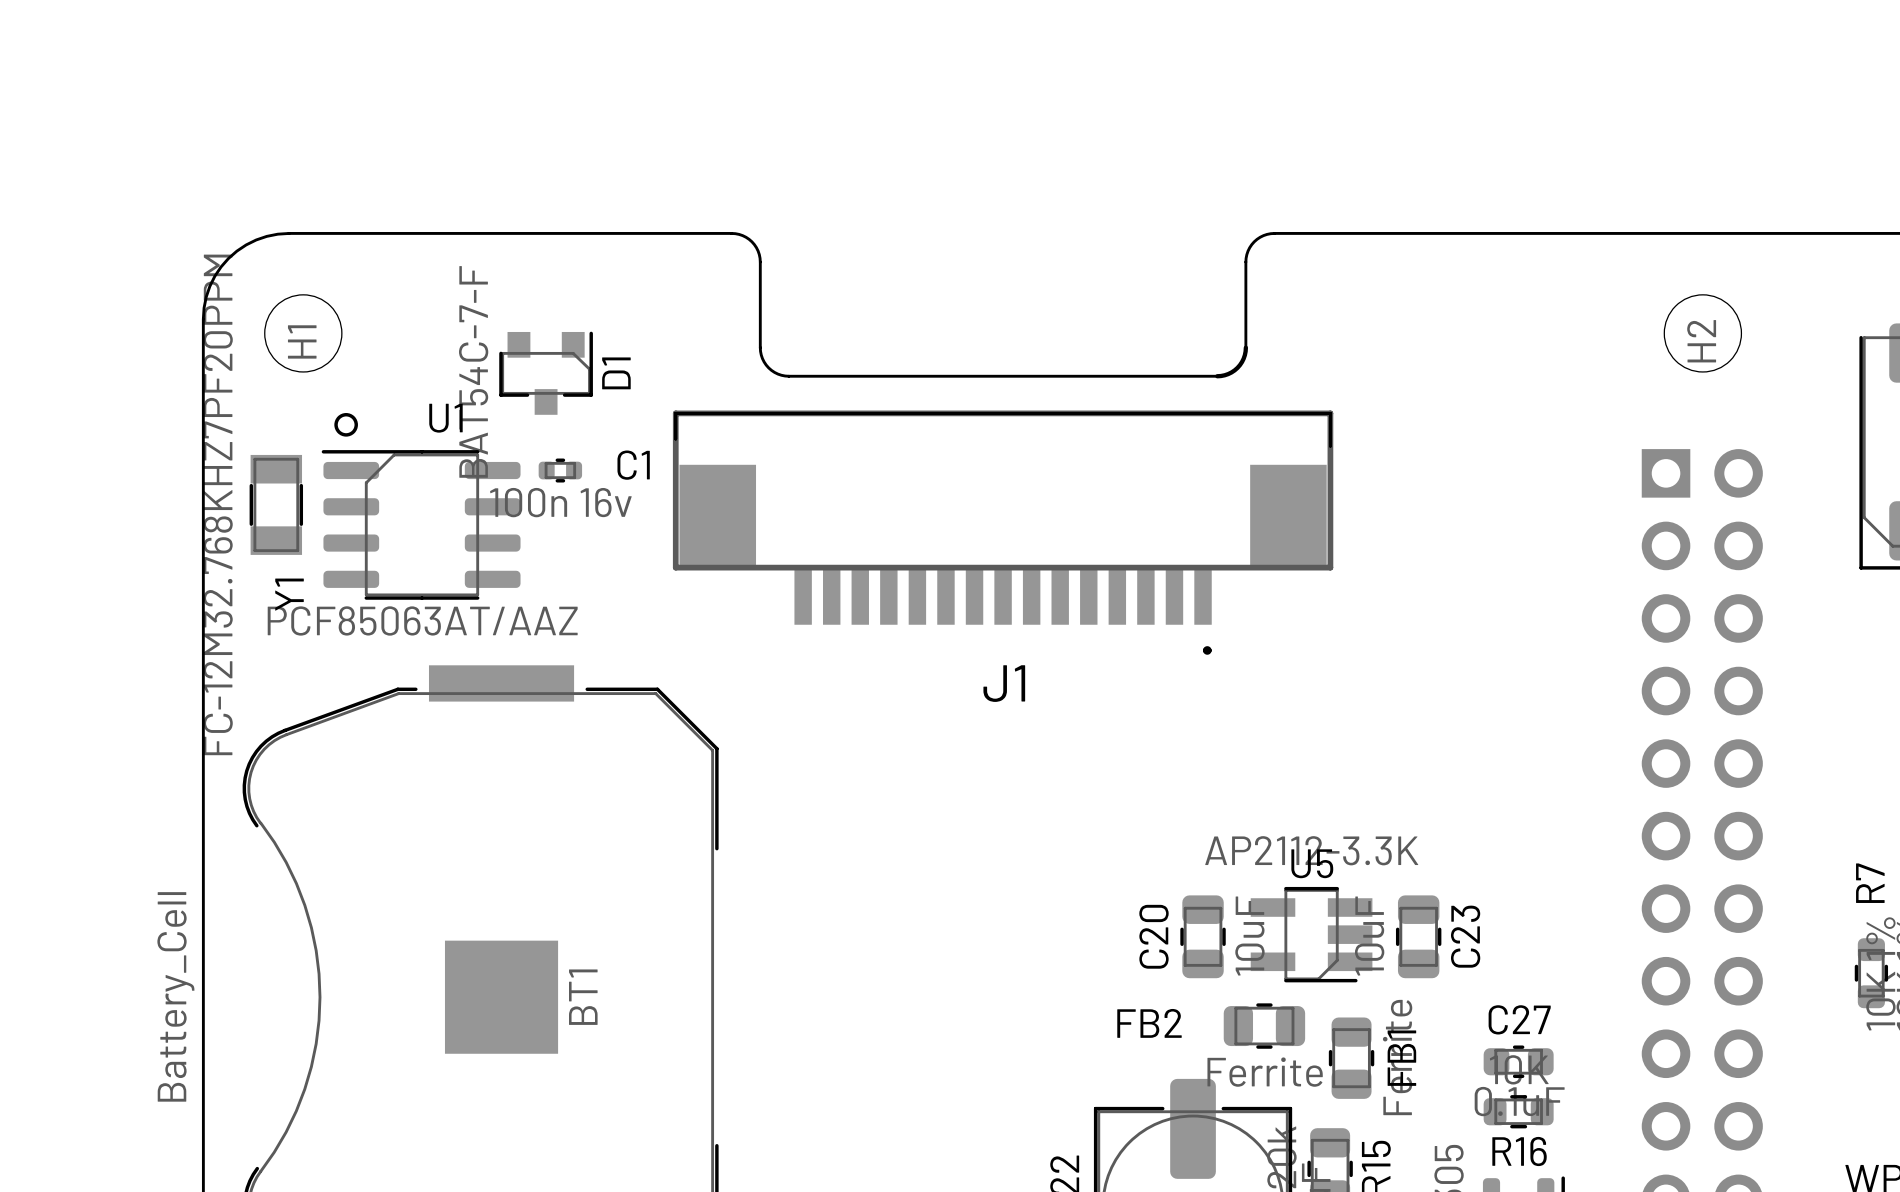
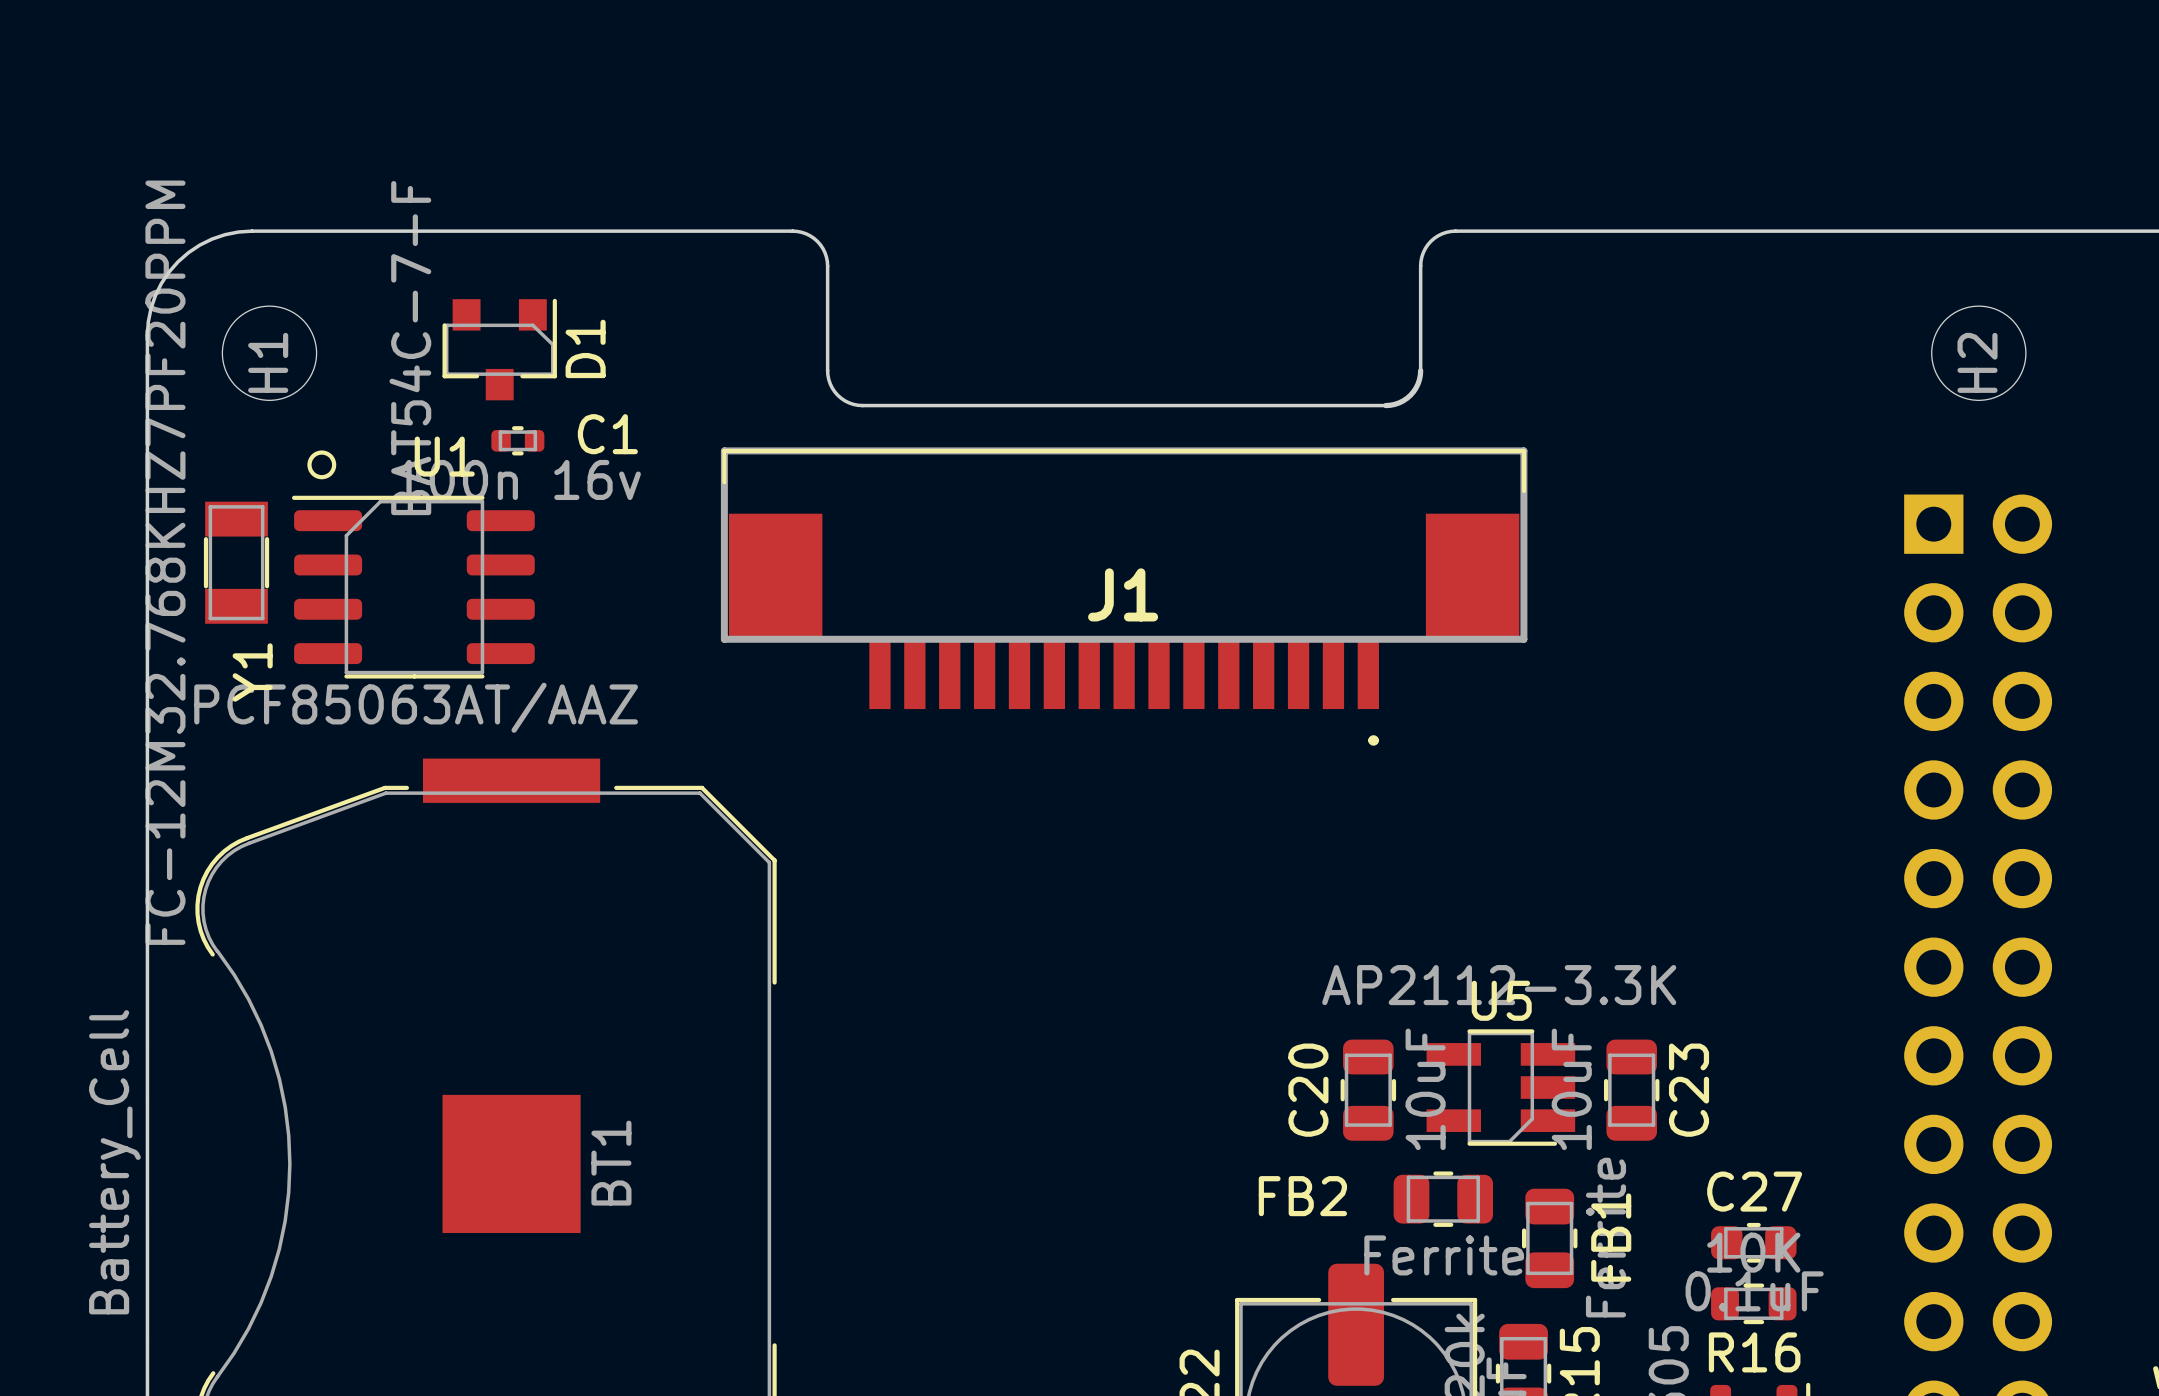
D1 position: (546, 373) -> (499, 349)
C1 position: (560, 470) -> (517, 440)
J1 name position: J1 (1004, 683) -> J1 (1123, 594)

